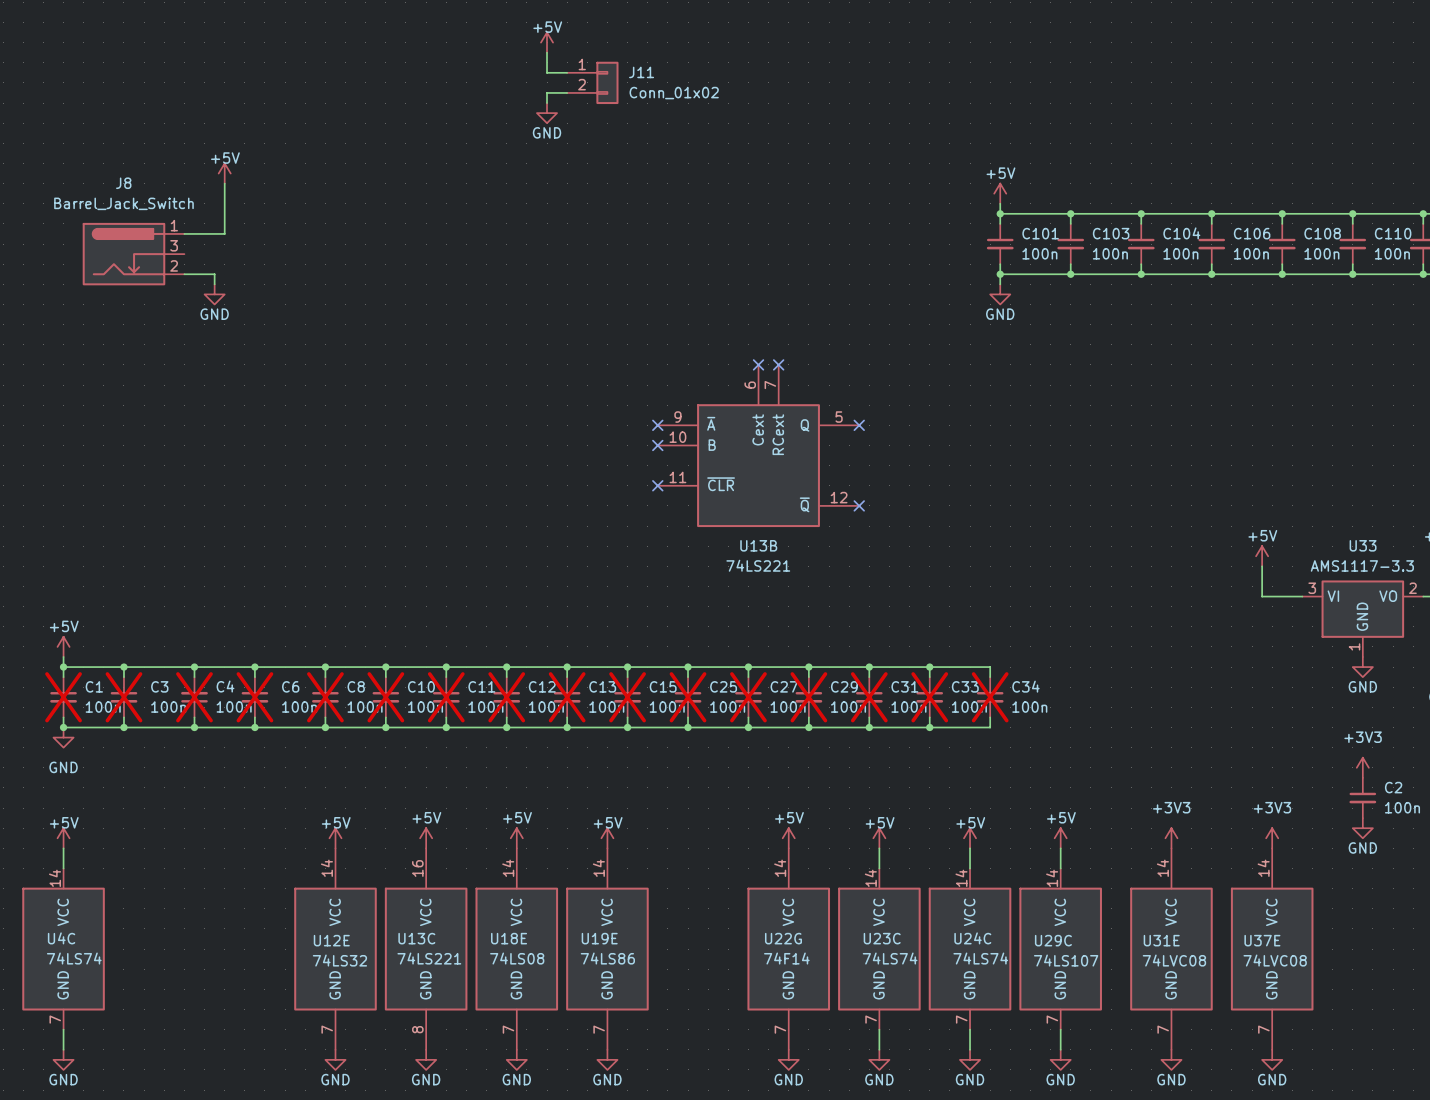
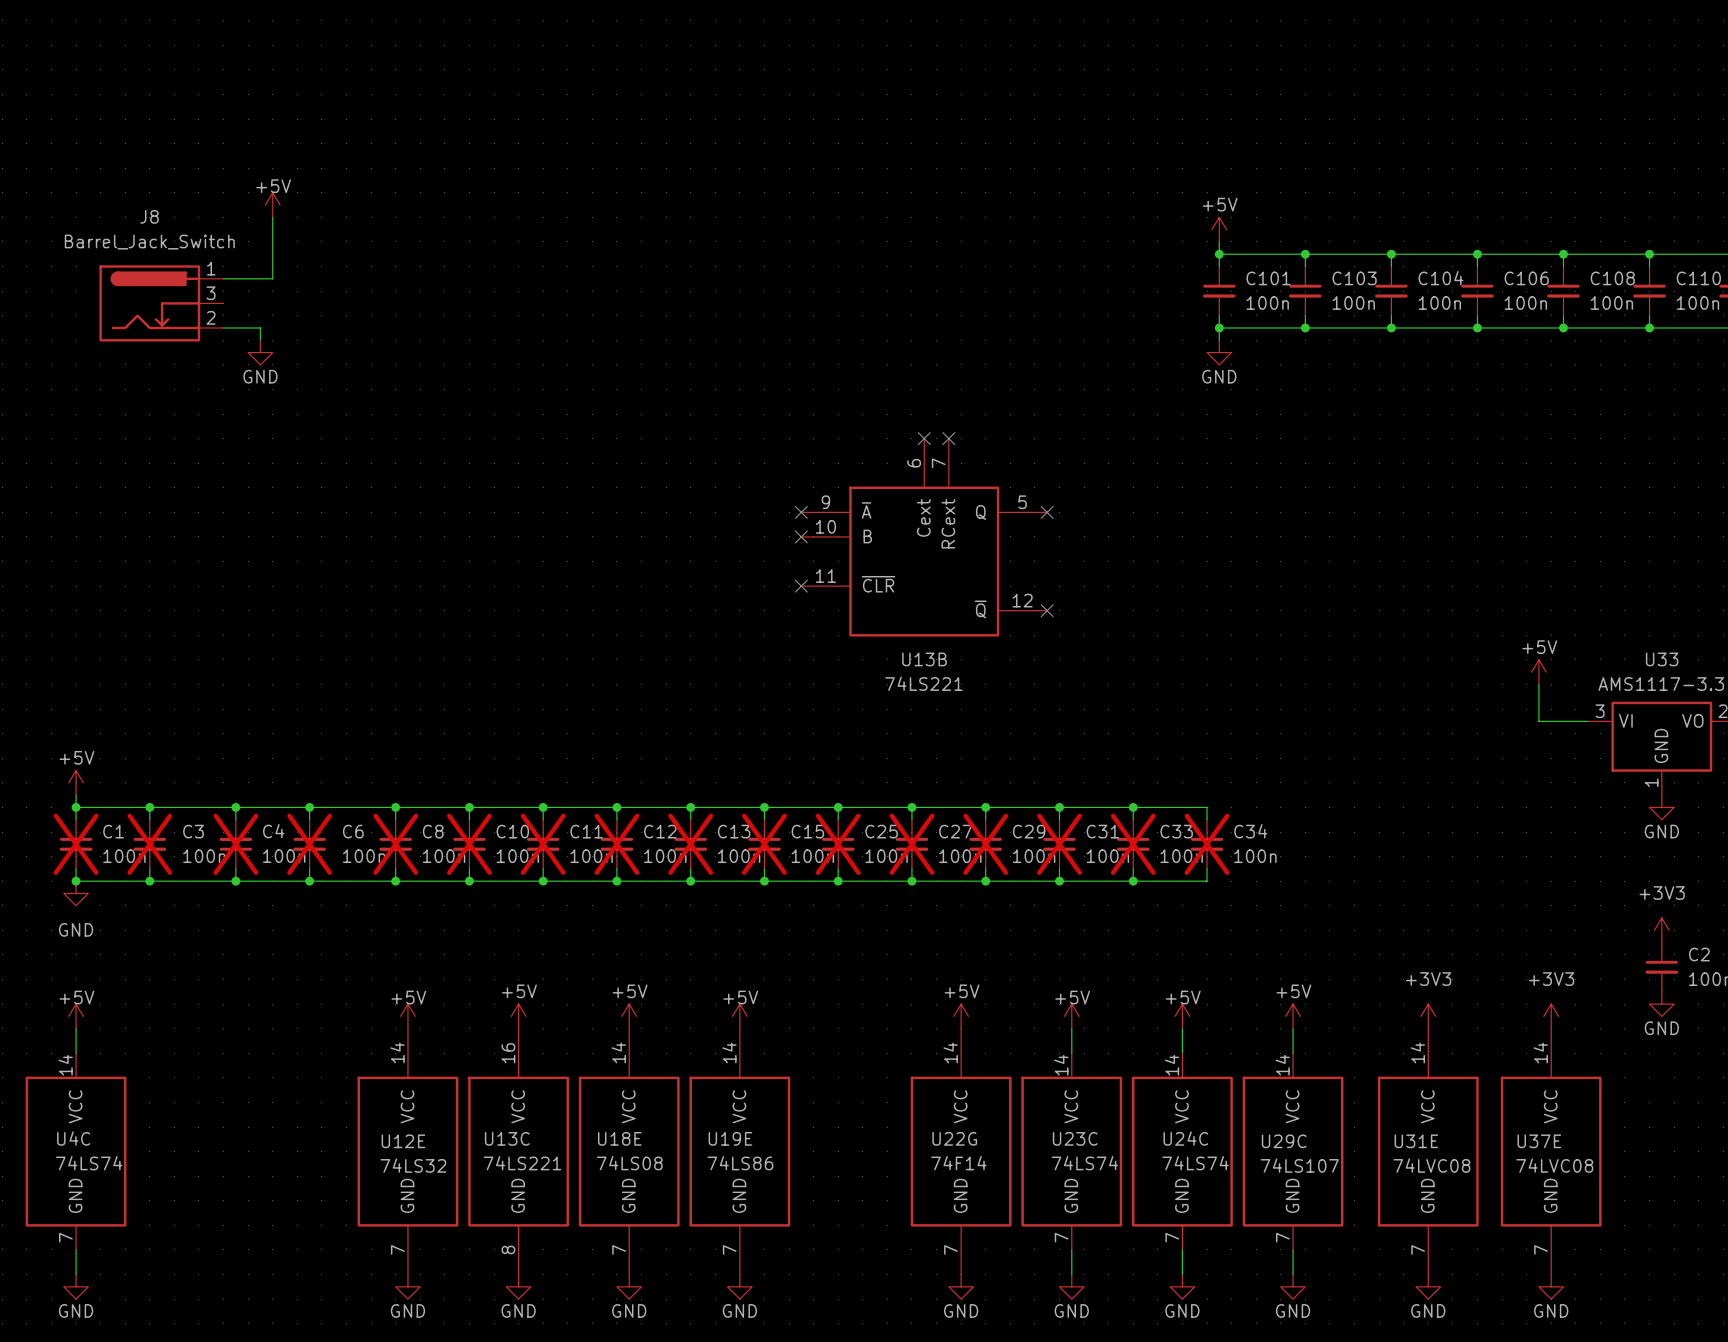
power symbol: +5V (547, 42) -> none
wire: (547, 52) (547, 72) (567, 72) -> none
J11: Conn_01x02 (592, 82) -> none
wire: (567, 92) (547, 92) (547, 103) -> none
power symbol: GND (547, 113) -> none

